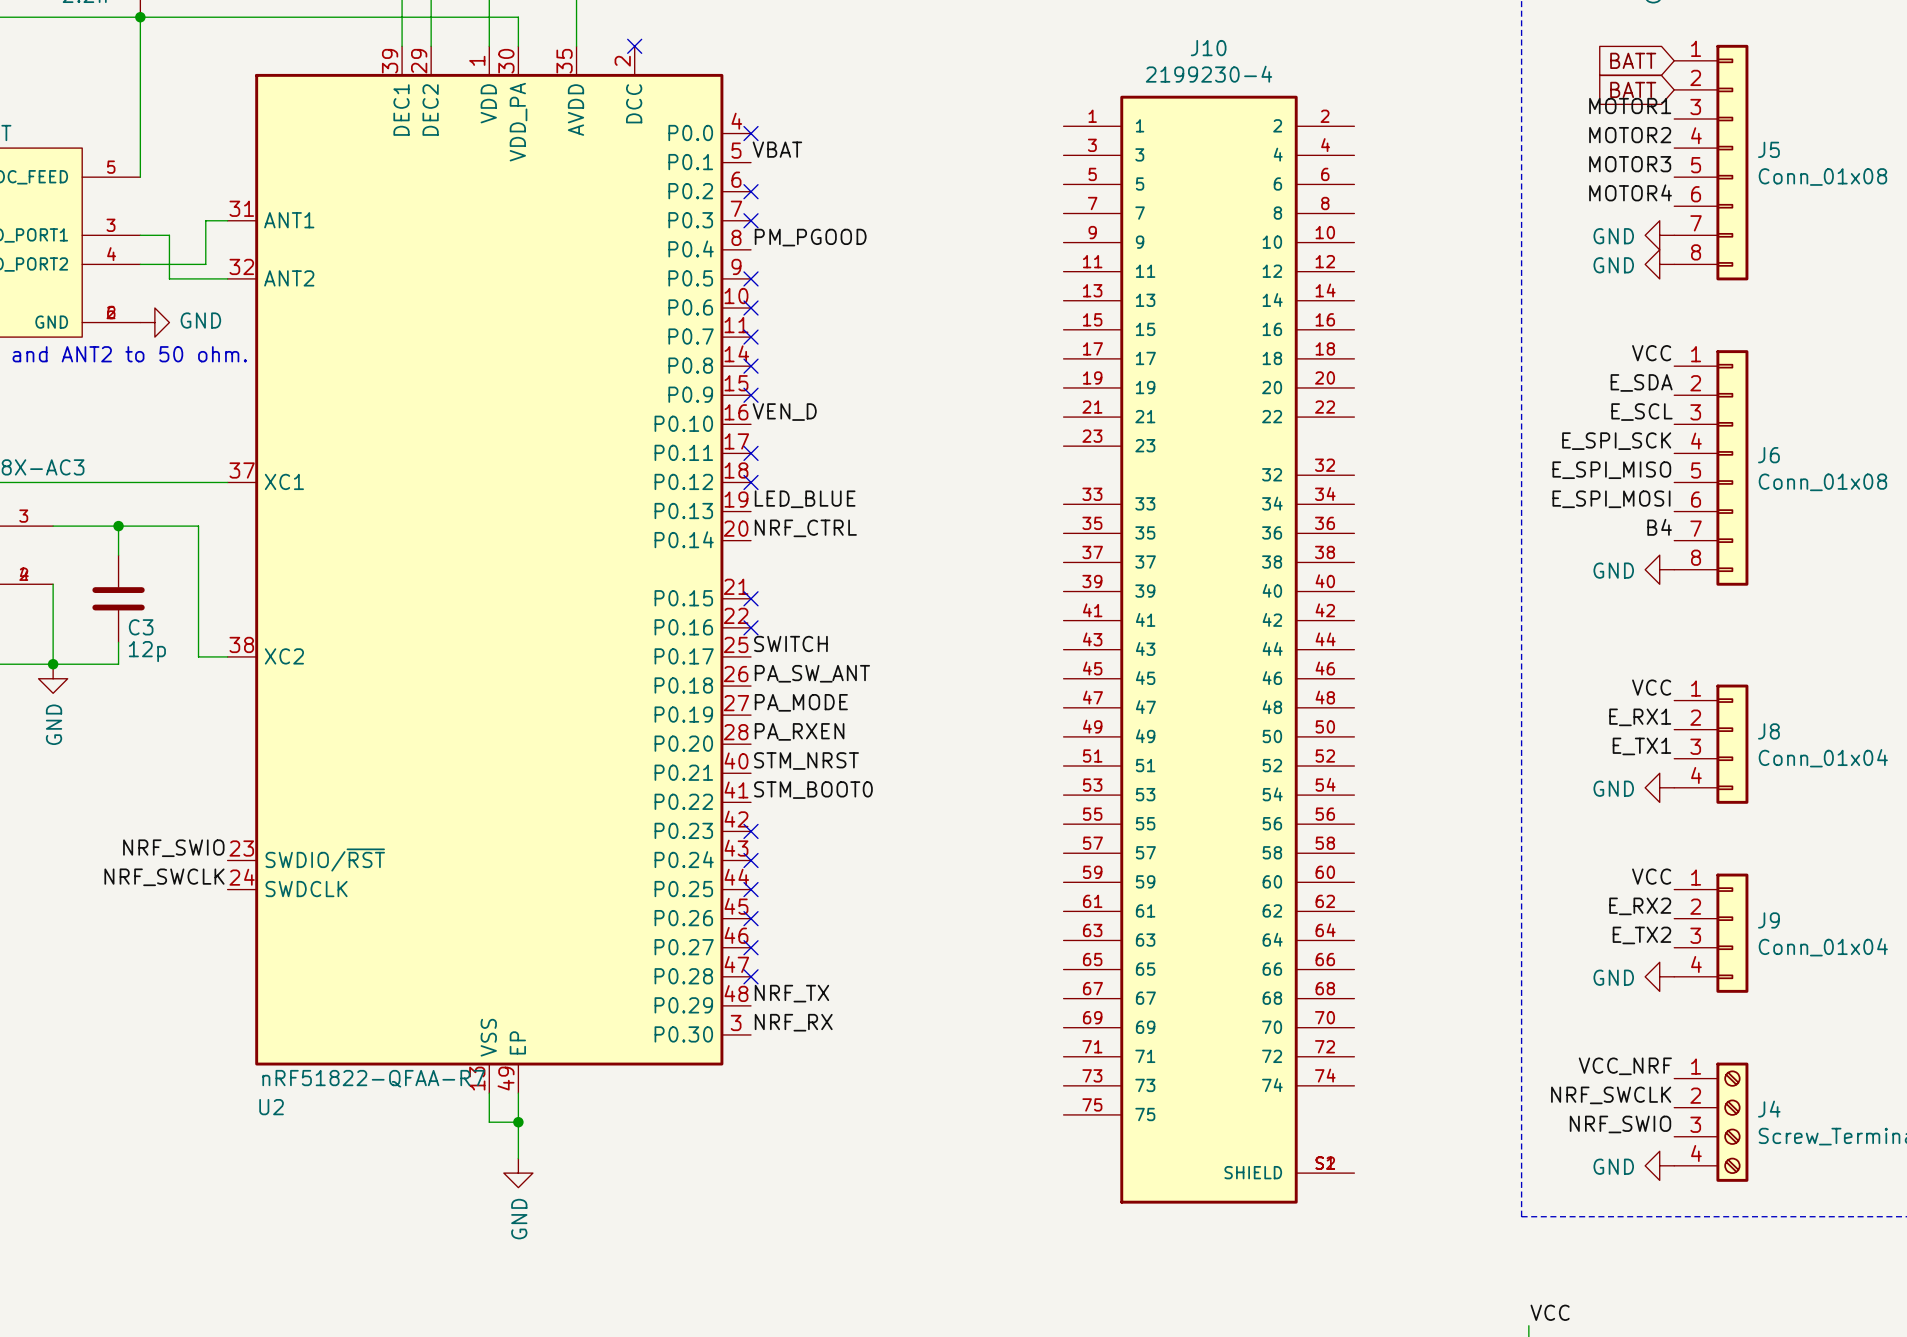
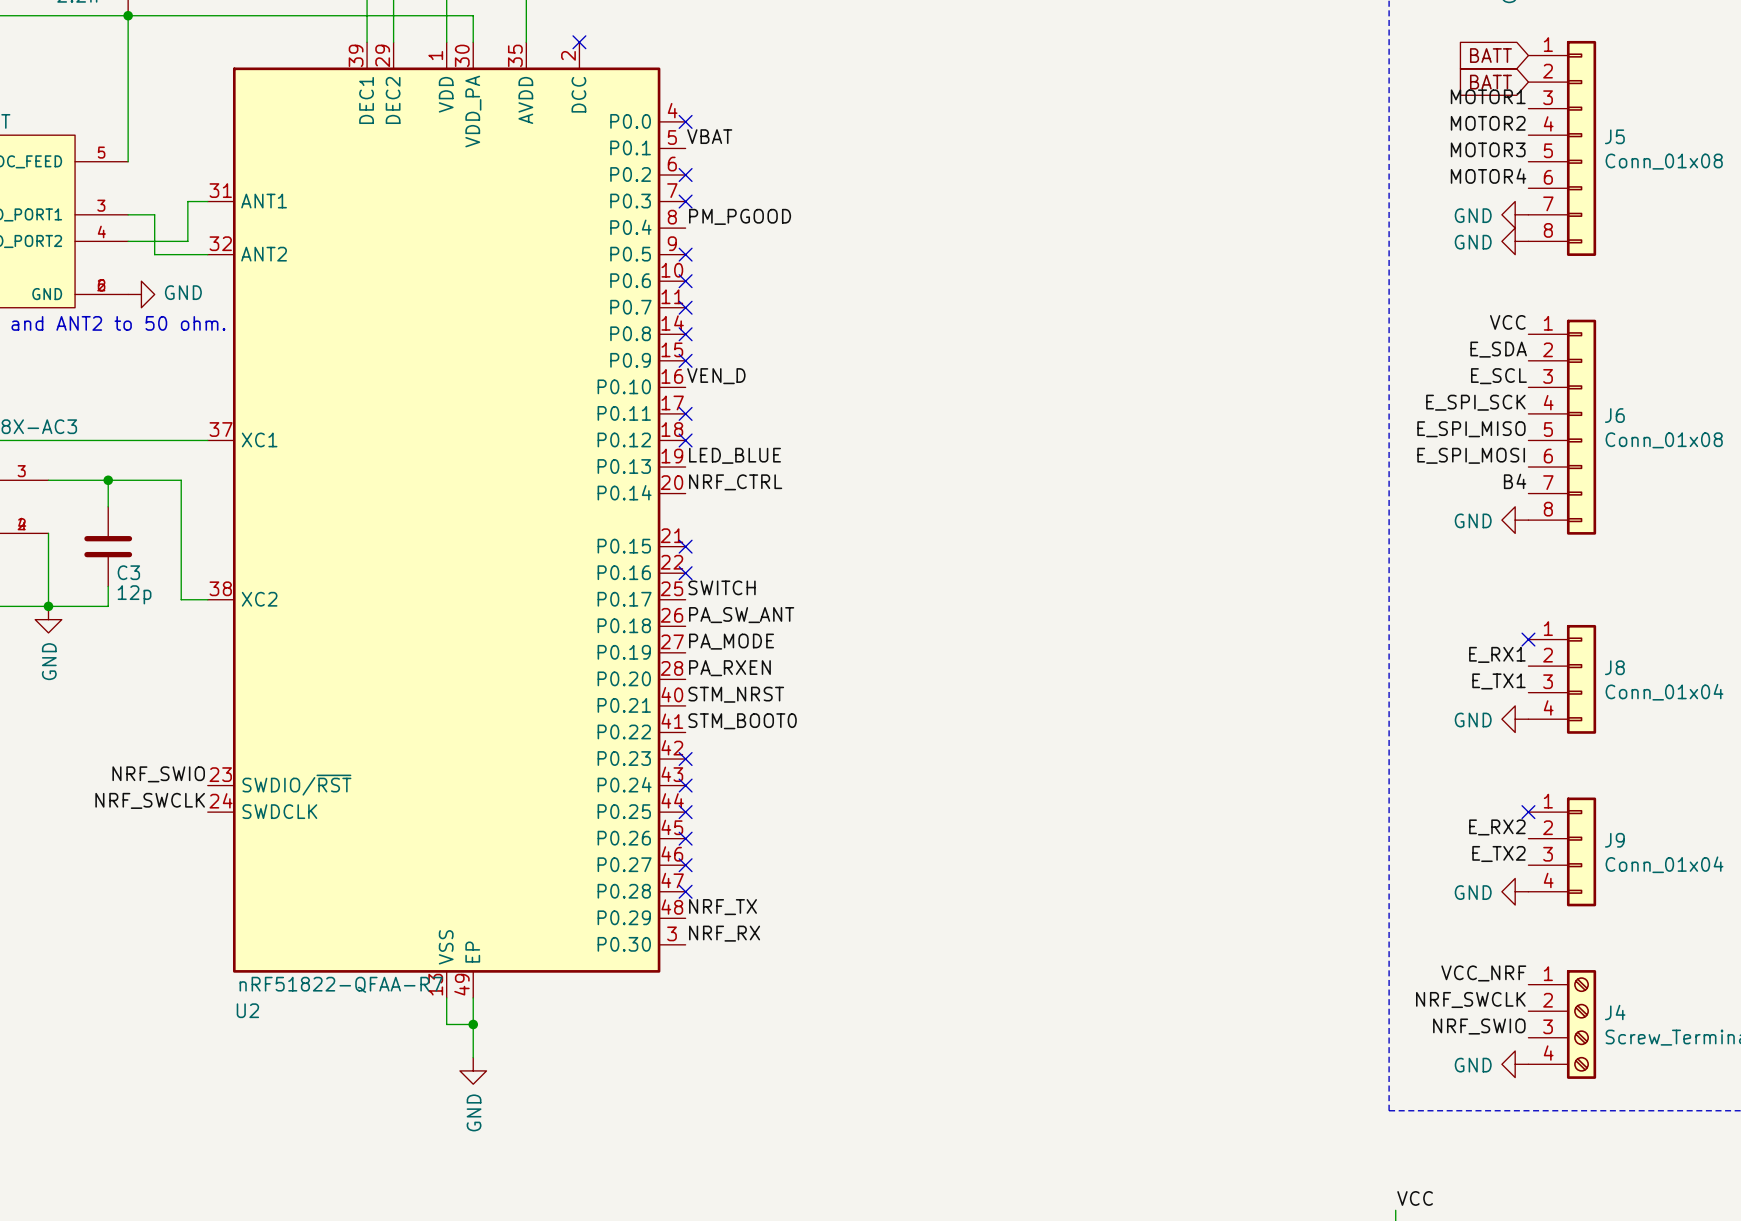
J10: 2199230-4 (1208, 649) -> none
label: VCC (1651, 687) -> none
no-connect mark: none -> (1528, 639)
label: VCC (1651, 876) -> none
no-connect mark: none -> (1528, 812)

